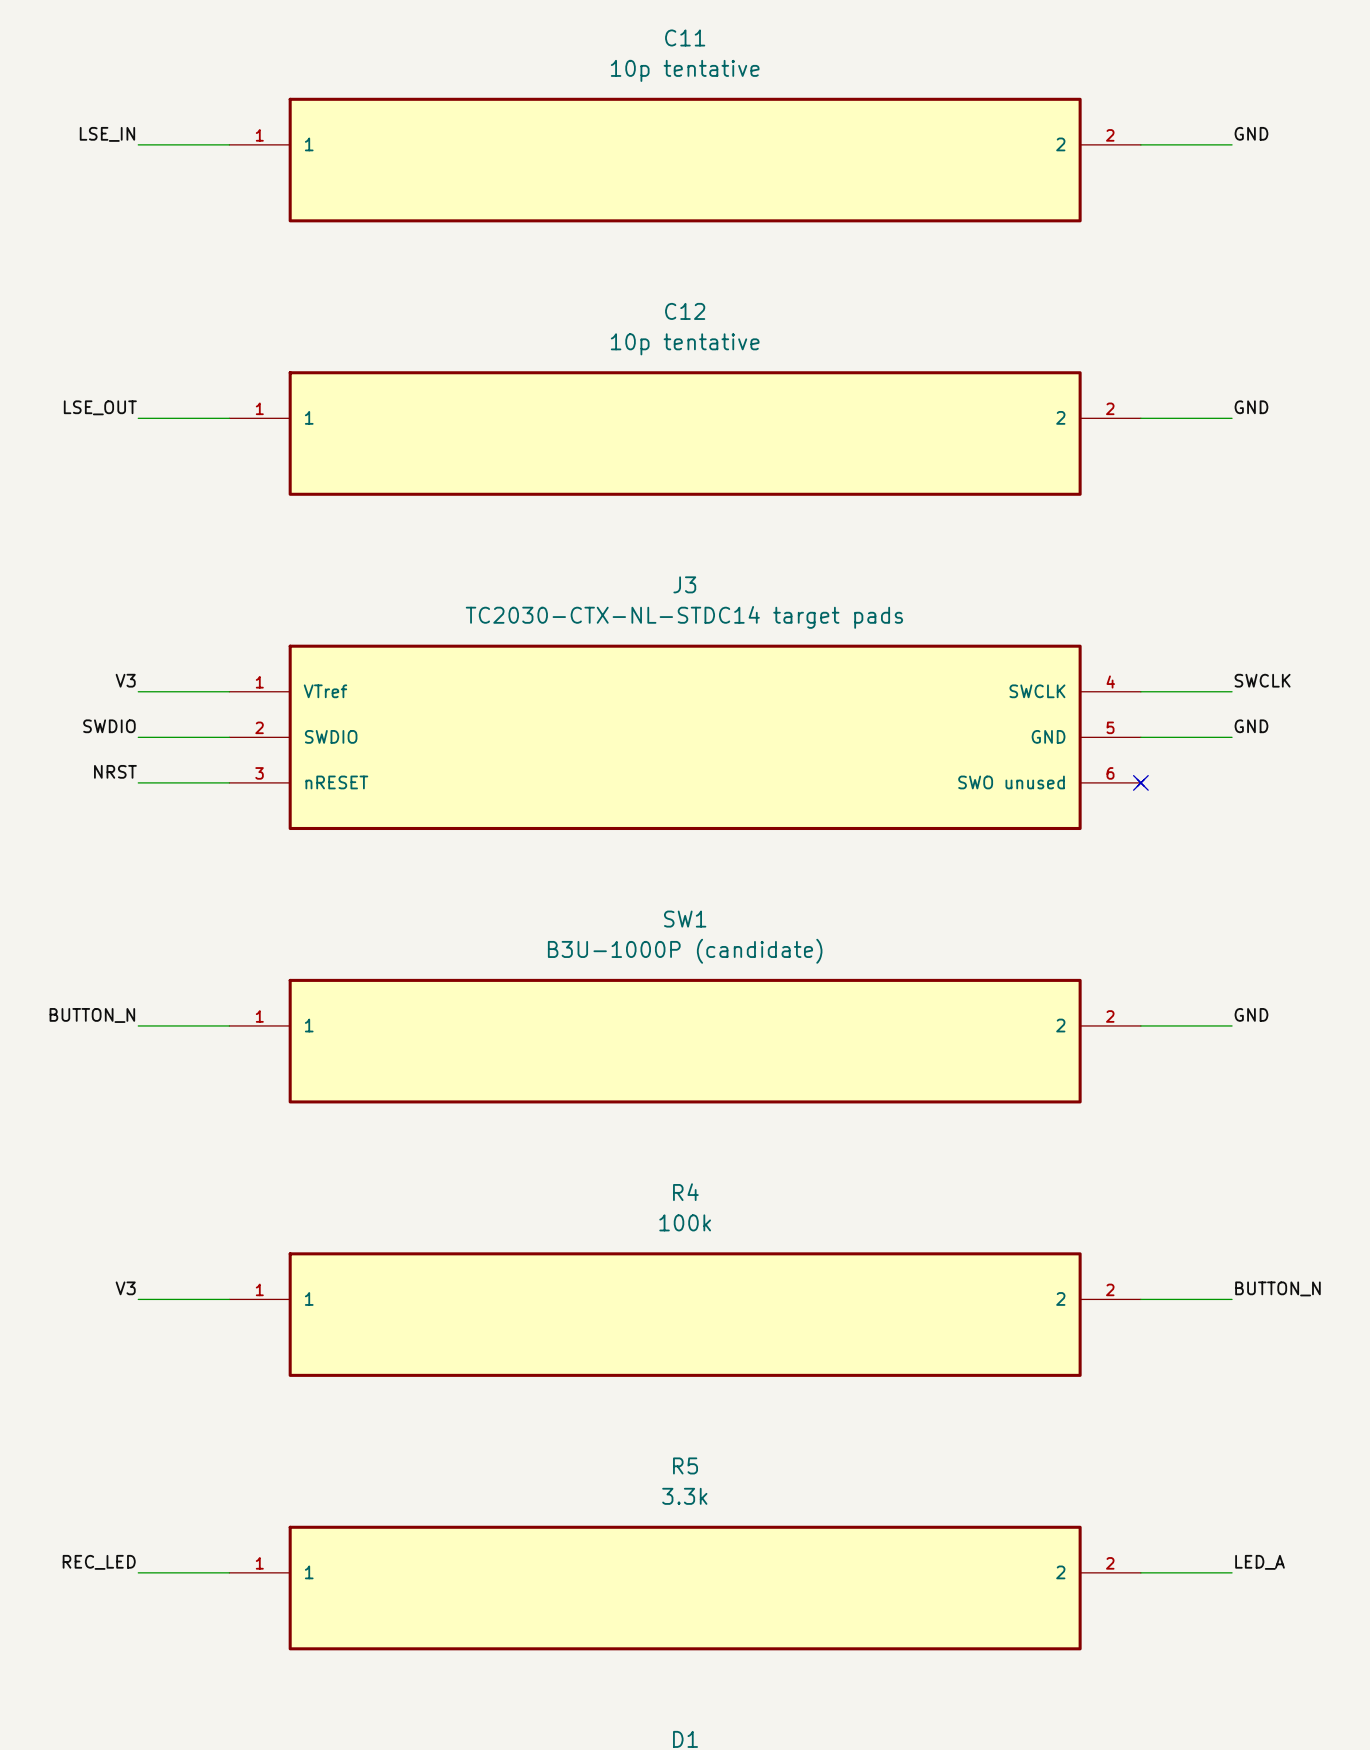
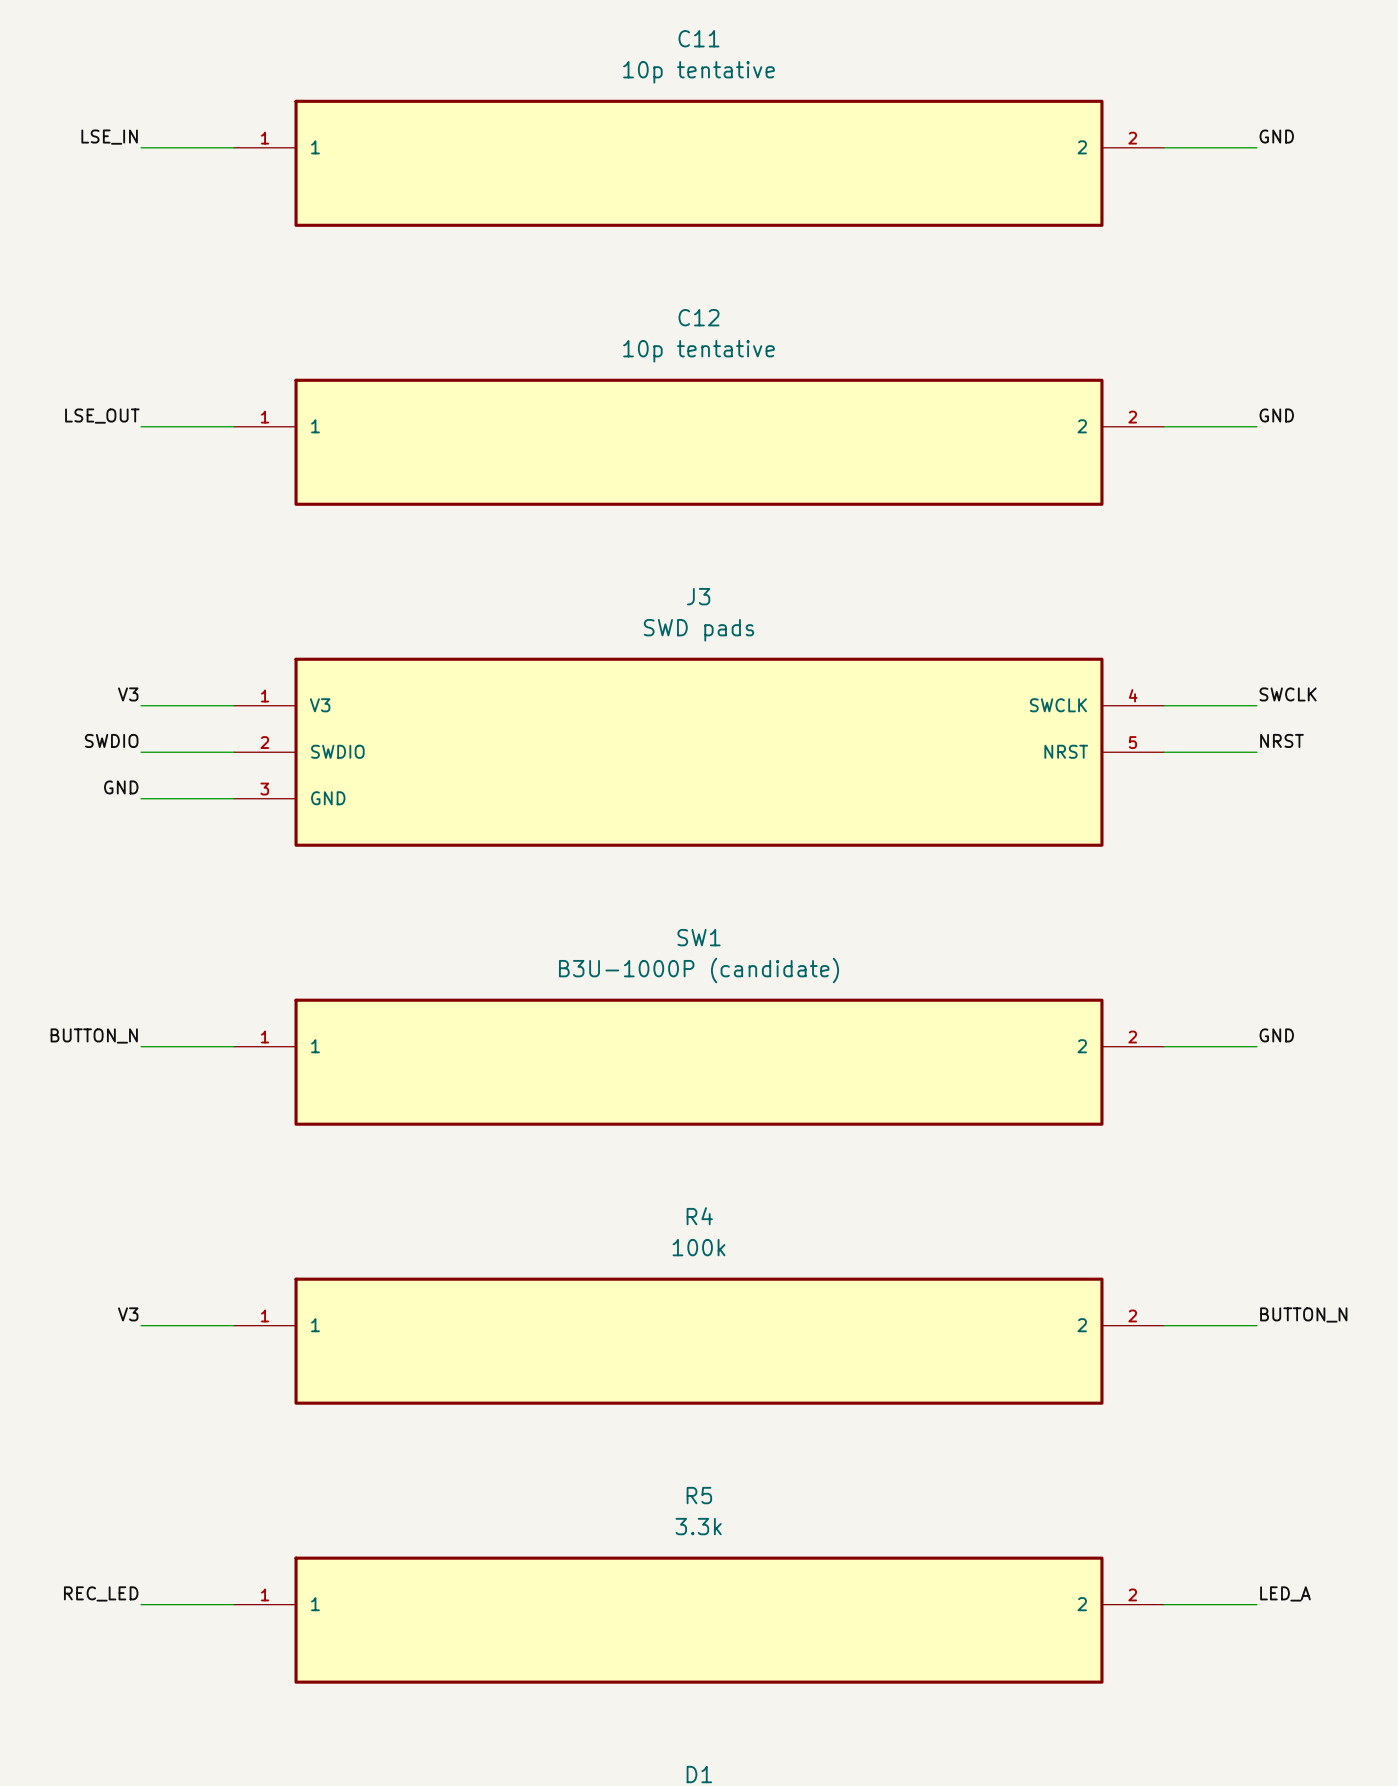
J3 value: TC2030-CTX-NL-STDC14 target pads (684, 617) -> SWD pads (699, 630)
J3 symbol: [229, 644, 1145, 831] -> [234, 657, 1164, 847]
label: GND (1251, 726) -> NRST (1281, 740)
label: NRST (115, 771) -> GND (121, 787)
no-connect mark: (1140, 782) -> none

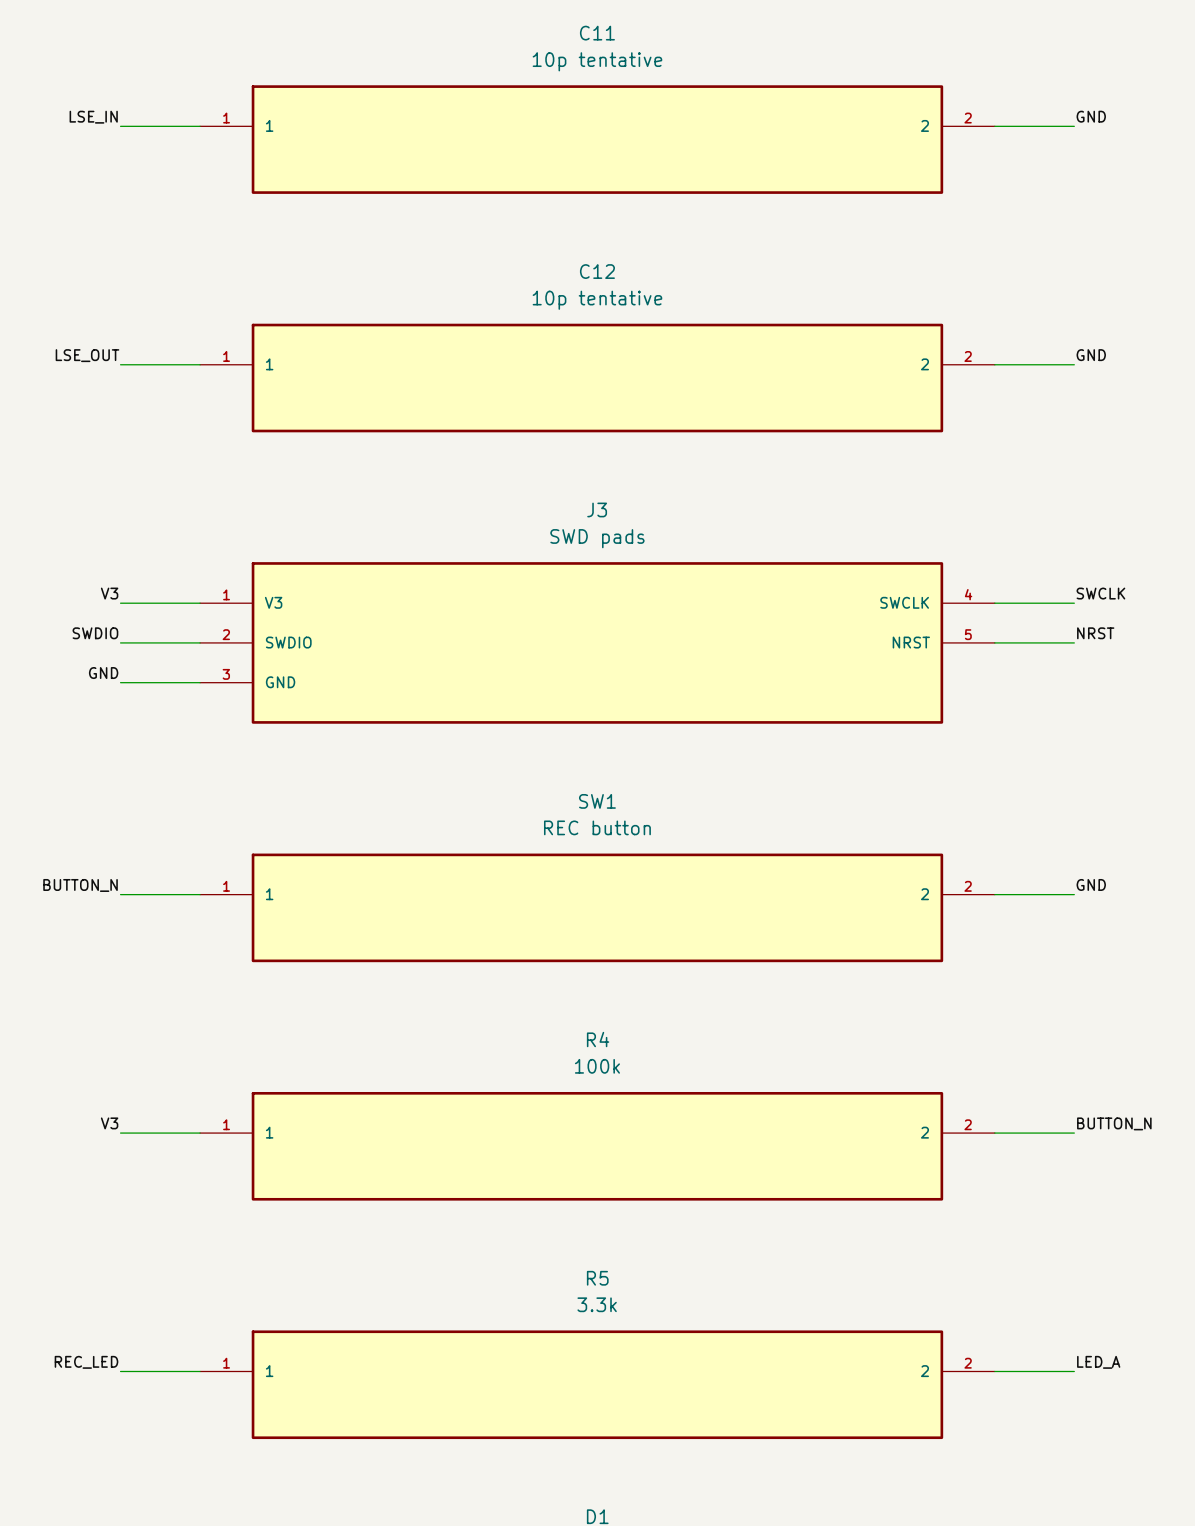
SW1 value: B3U-1000P (candidate) (699, 970) -> REC button (597, 827)

